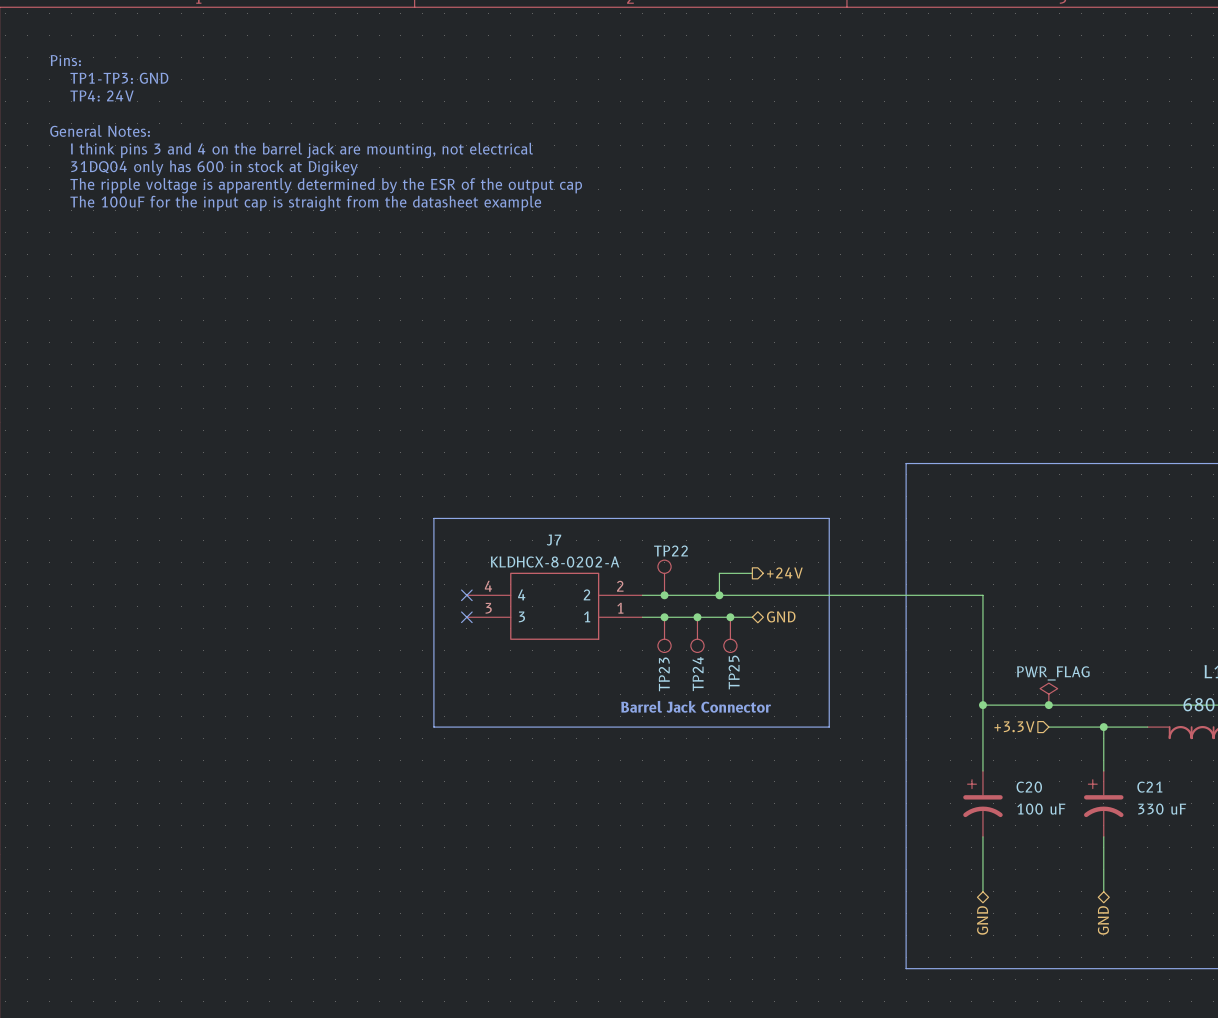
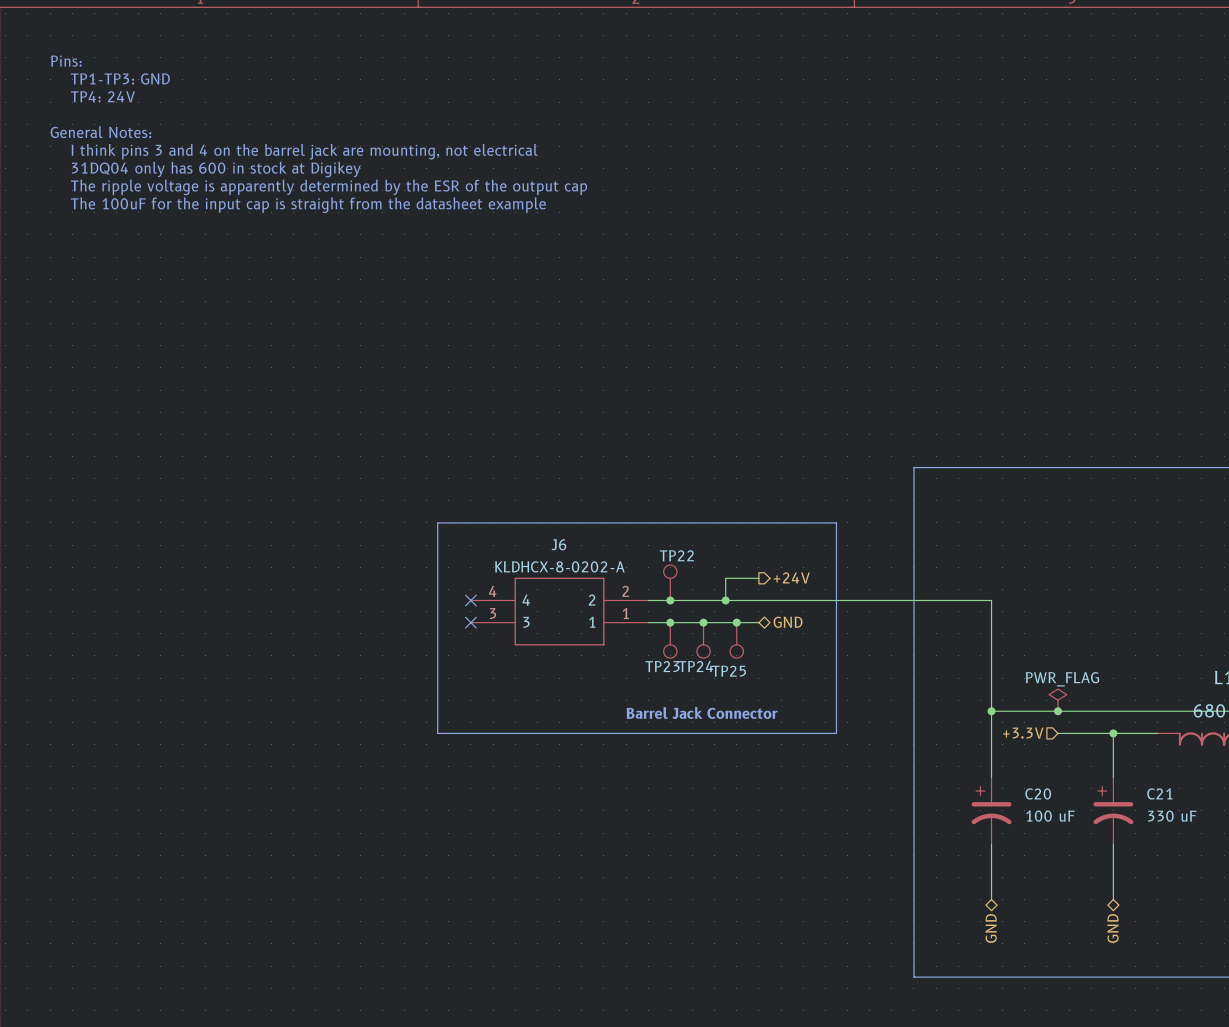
J7 name: J7 (553, 540) -> J6 (558, 544)
TP25 name rotation: 0° (734, 672) -> 90° clockwise (729, 671)
TP23 name rotation: 0° (664, 674) -> 90° clockwise (662, 666)
TP24 name rotation: 0° (698, 674) -> 90° clockwise (695, 666)

